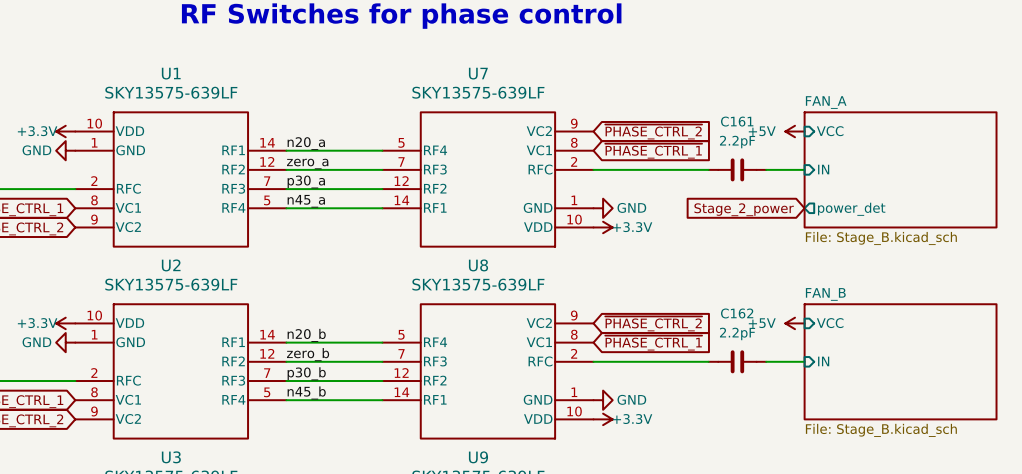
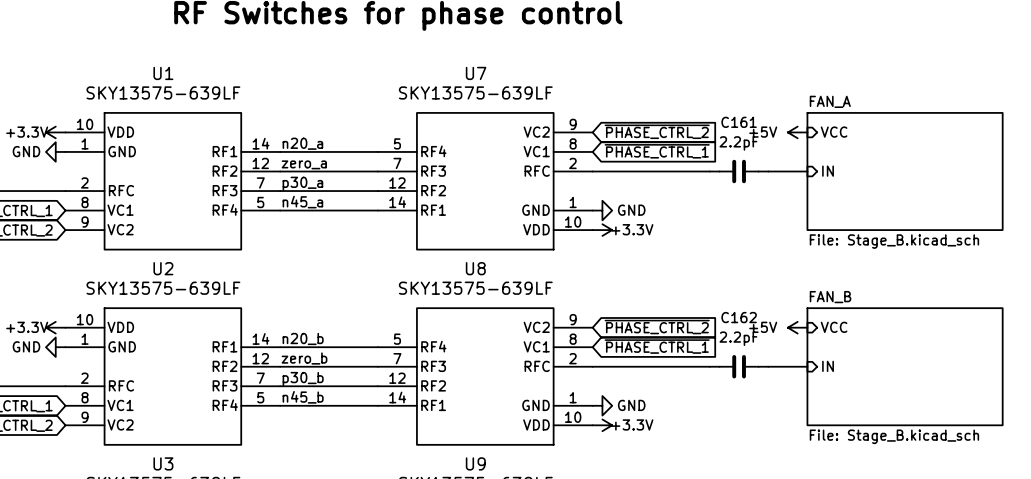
global label: Stage_2_power (744, 209) -> none
sheet pin: power_det (851, 209) -> none

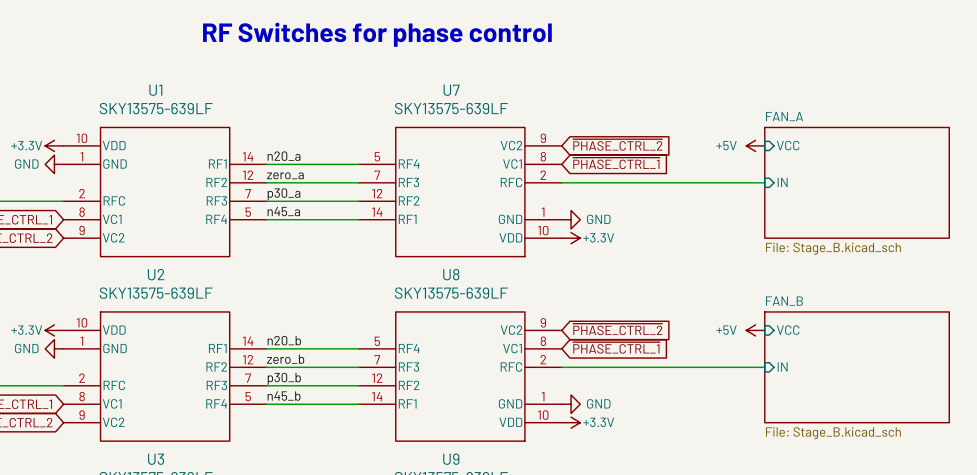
C161: 2.2pF (739, 171) -> none
C162: 2.2pF (739, 366) -> none

